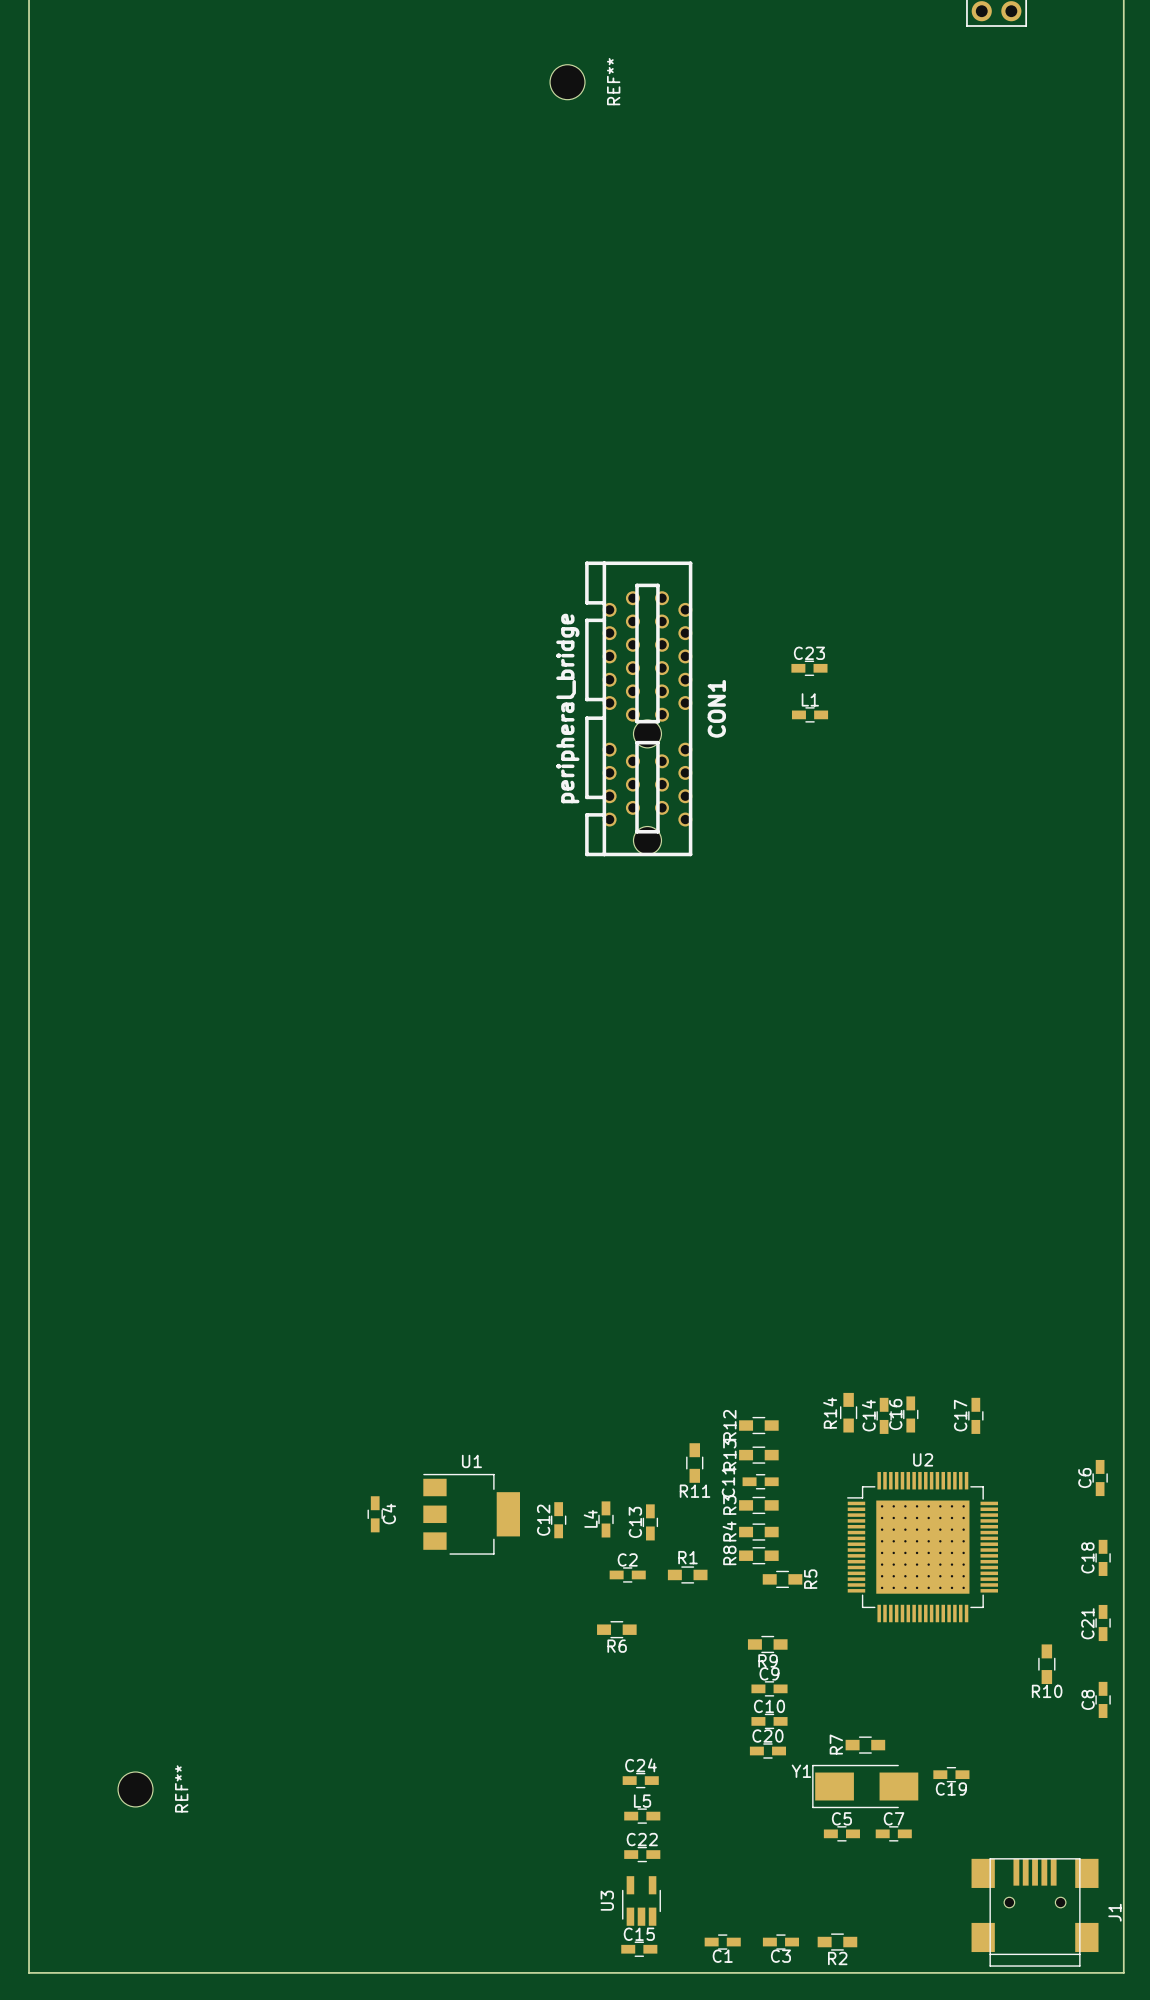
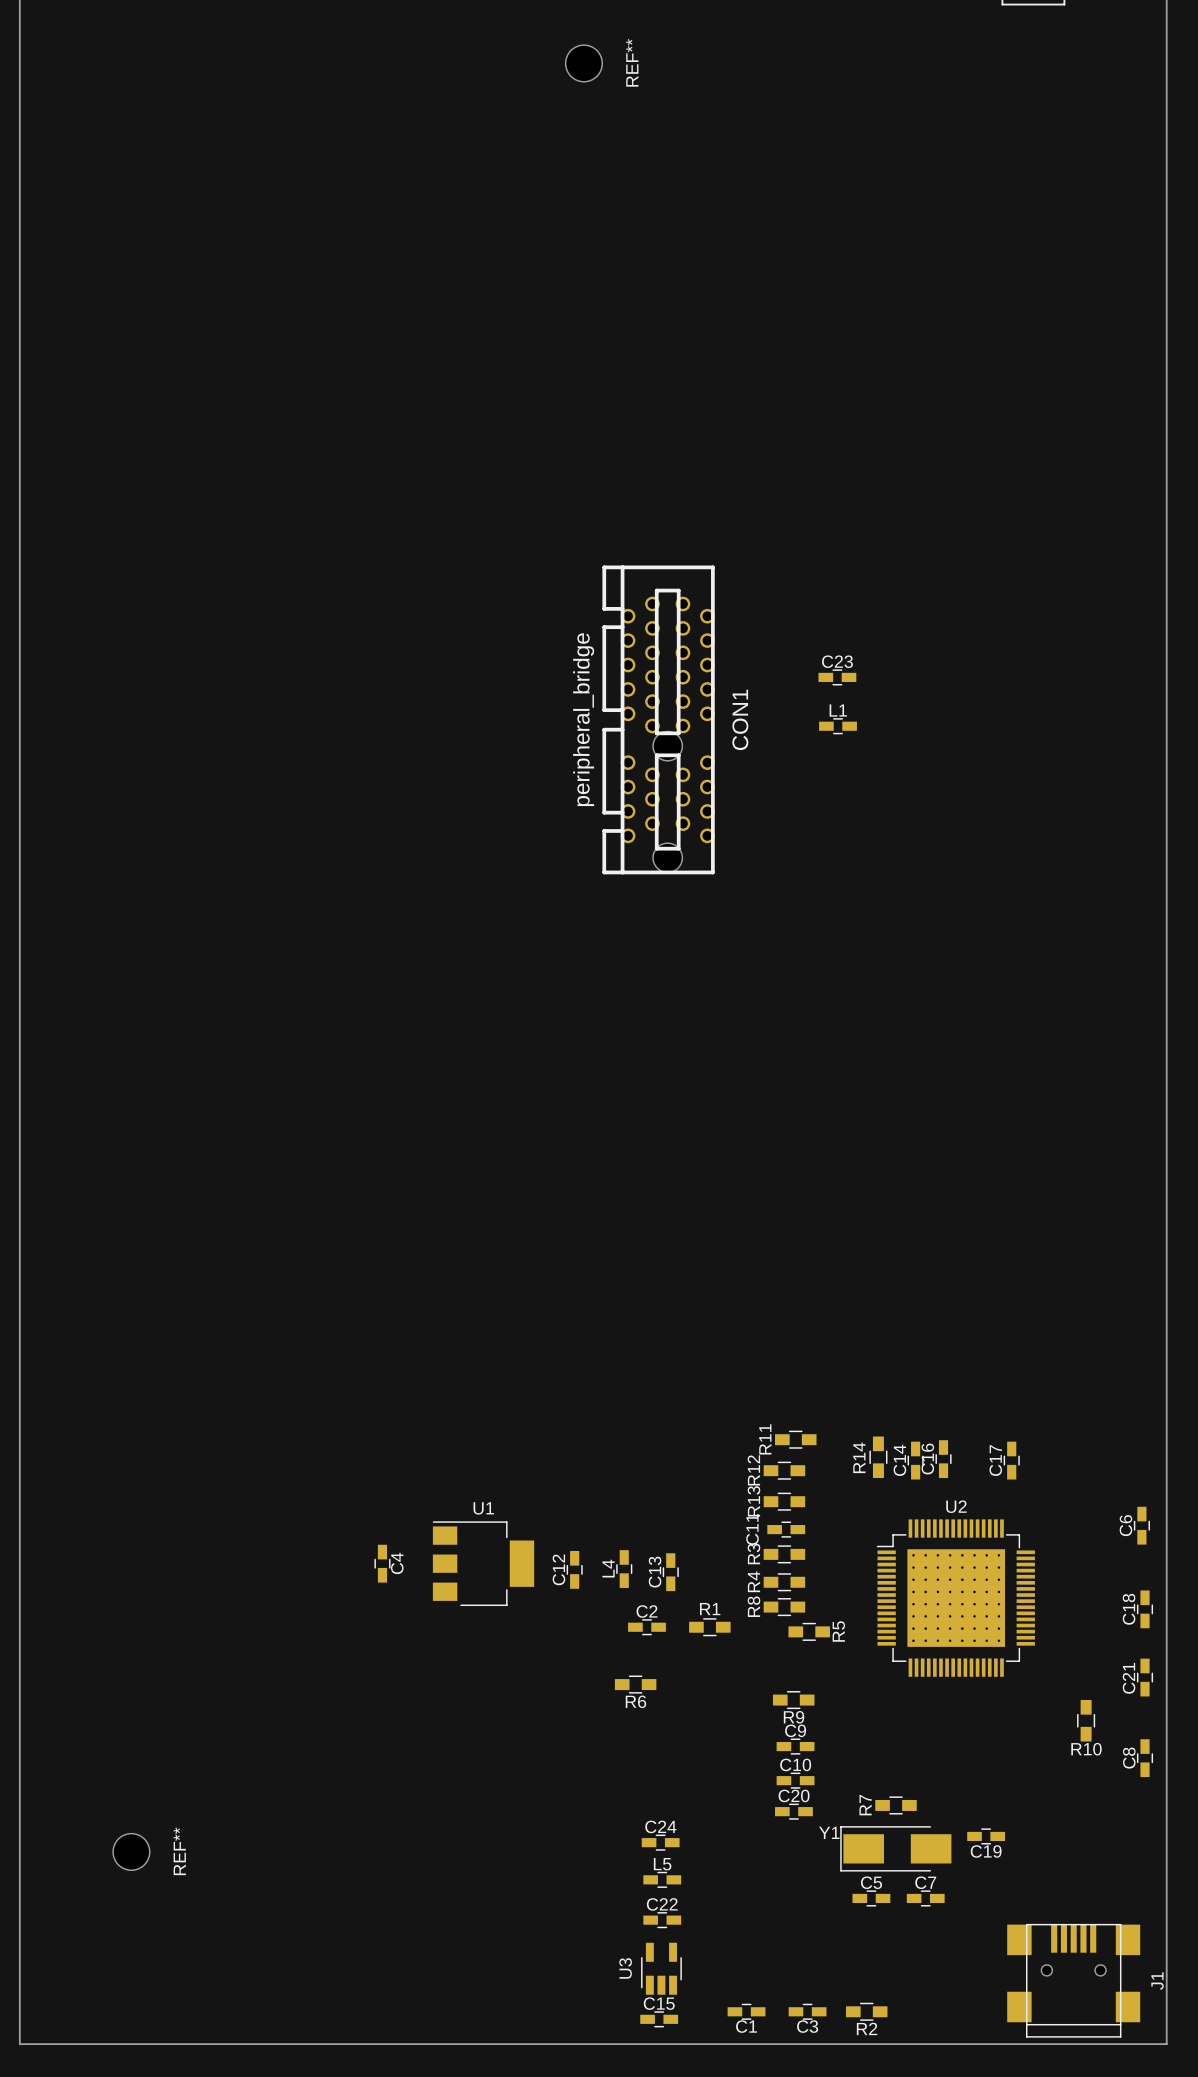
R11 rotation: 0° (694, 1463) -> 90° clockwise (795, 1439)
R11 position: (694, 1463) -> (795, 1439)

